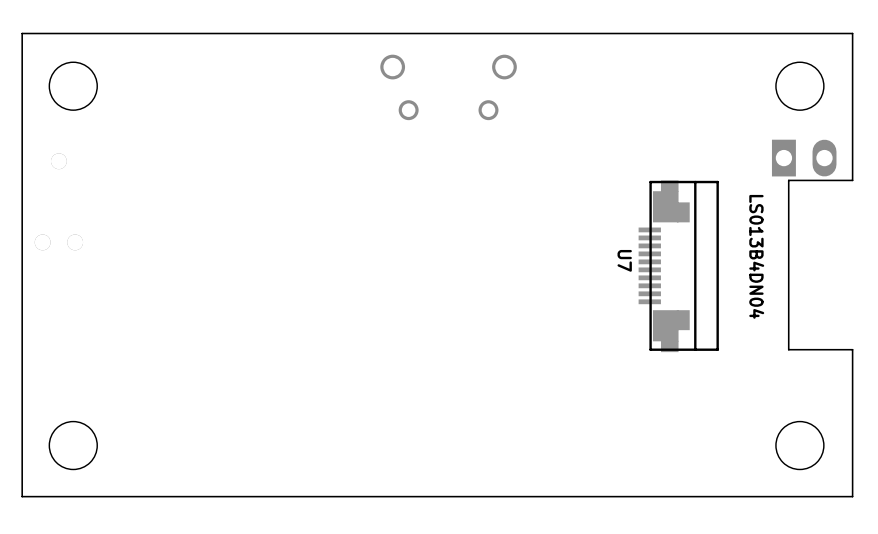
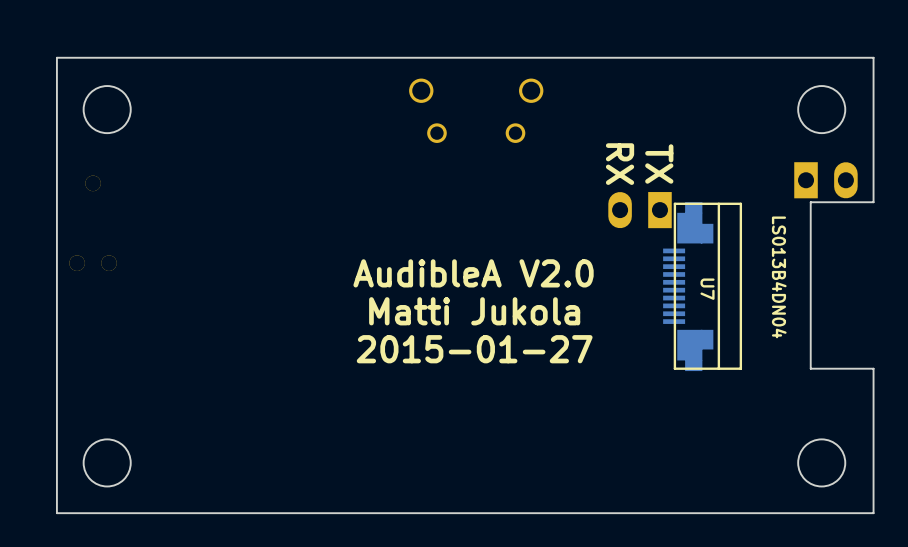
text: none -> RX (620, 164)
text: none -> TX (659, 163)
part: none -> (640, 210)
text: none -> AudibleA V2.0 (473, 273)
U7 name position: U7 (624, 260) -> U7 (707, 289)
text: none -> Matti Jukola (474, 311)
text: none -> 2015-01-27 (474, 349)

